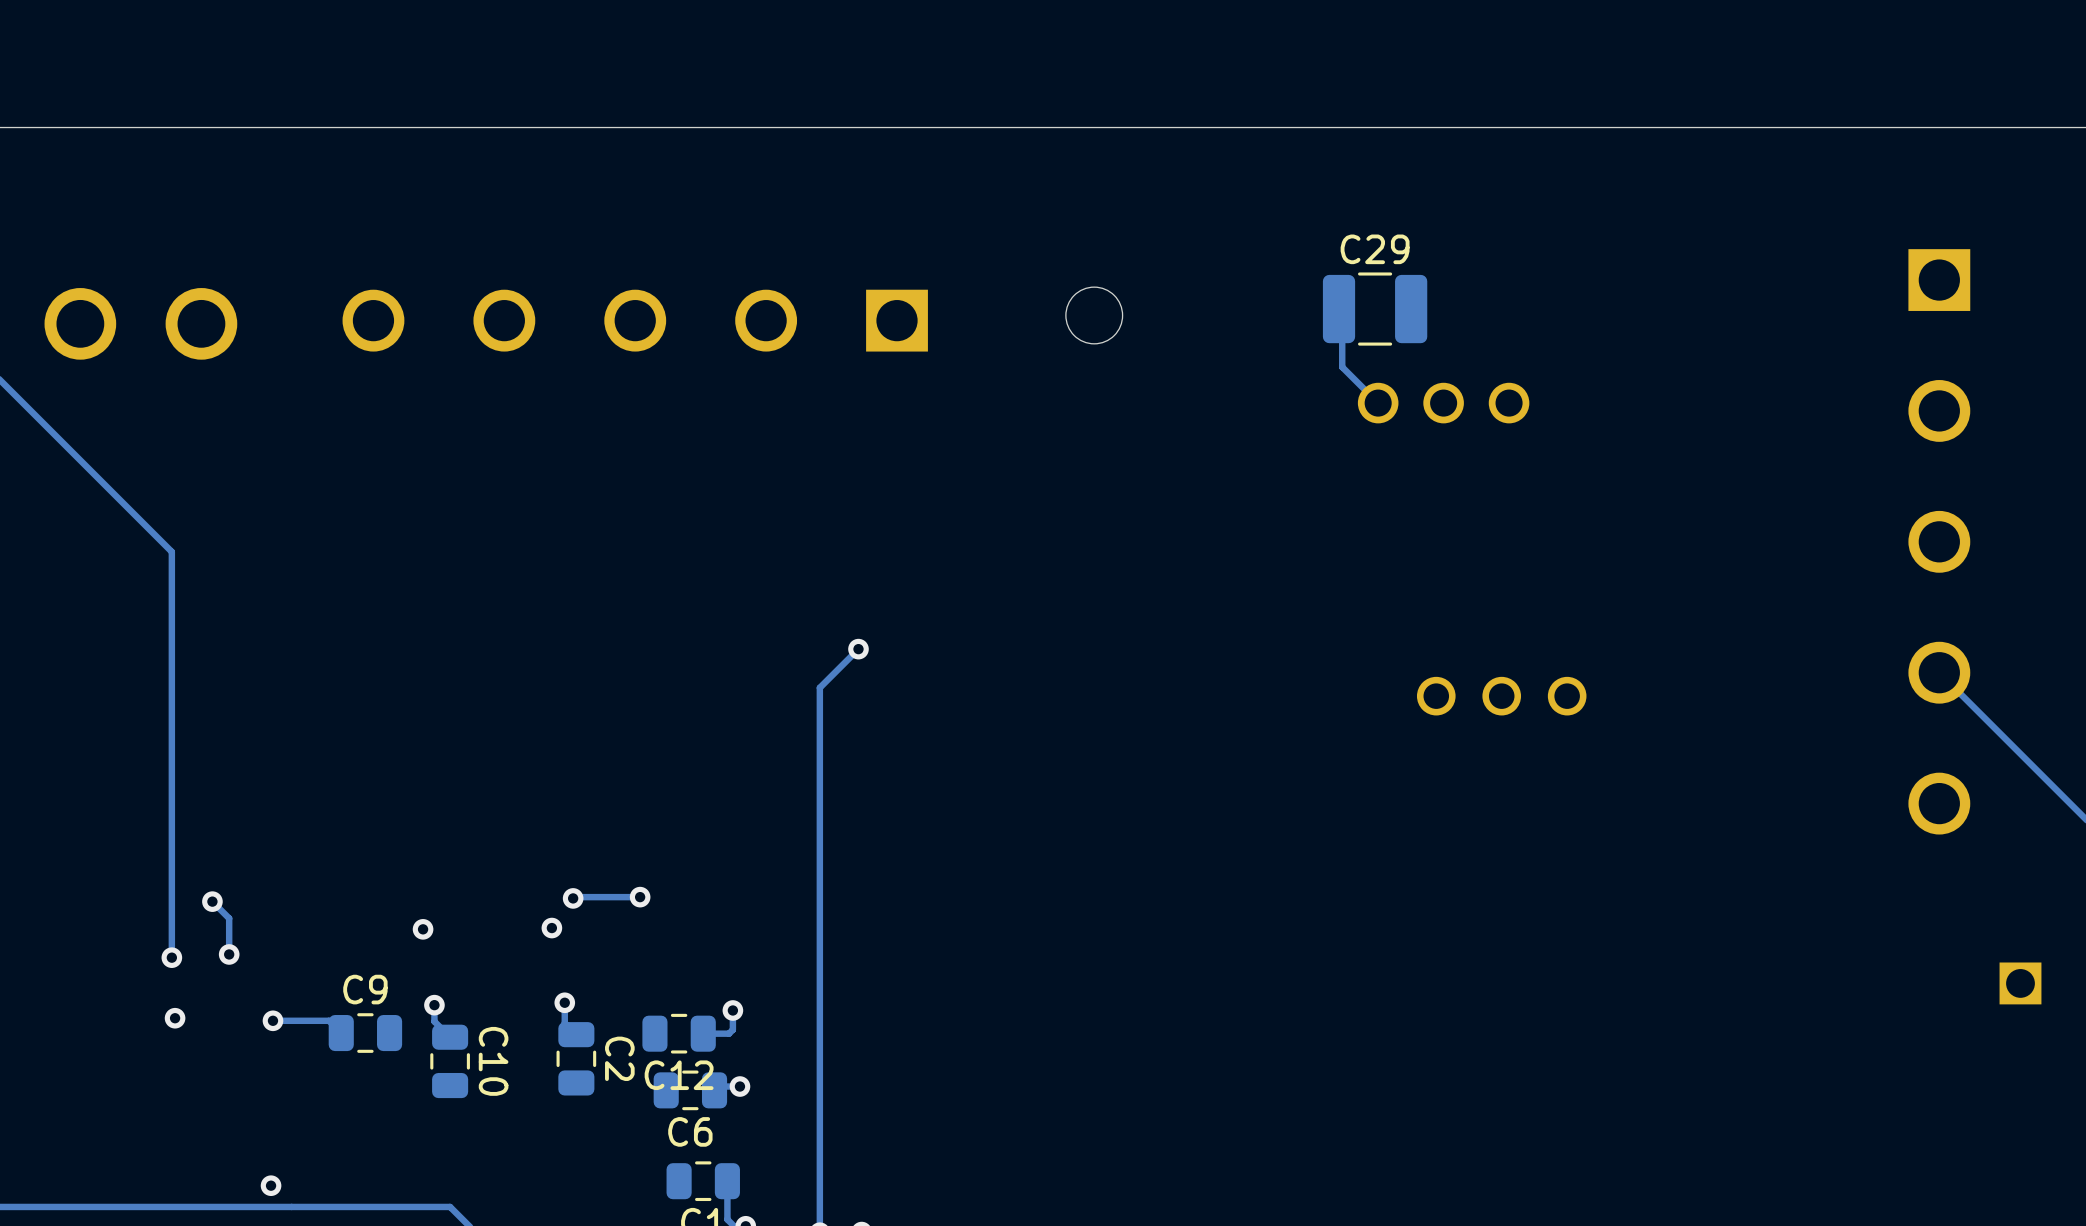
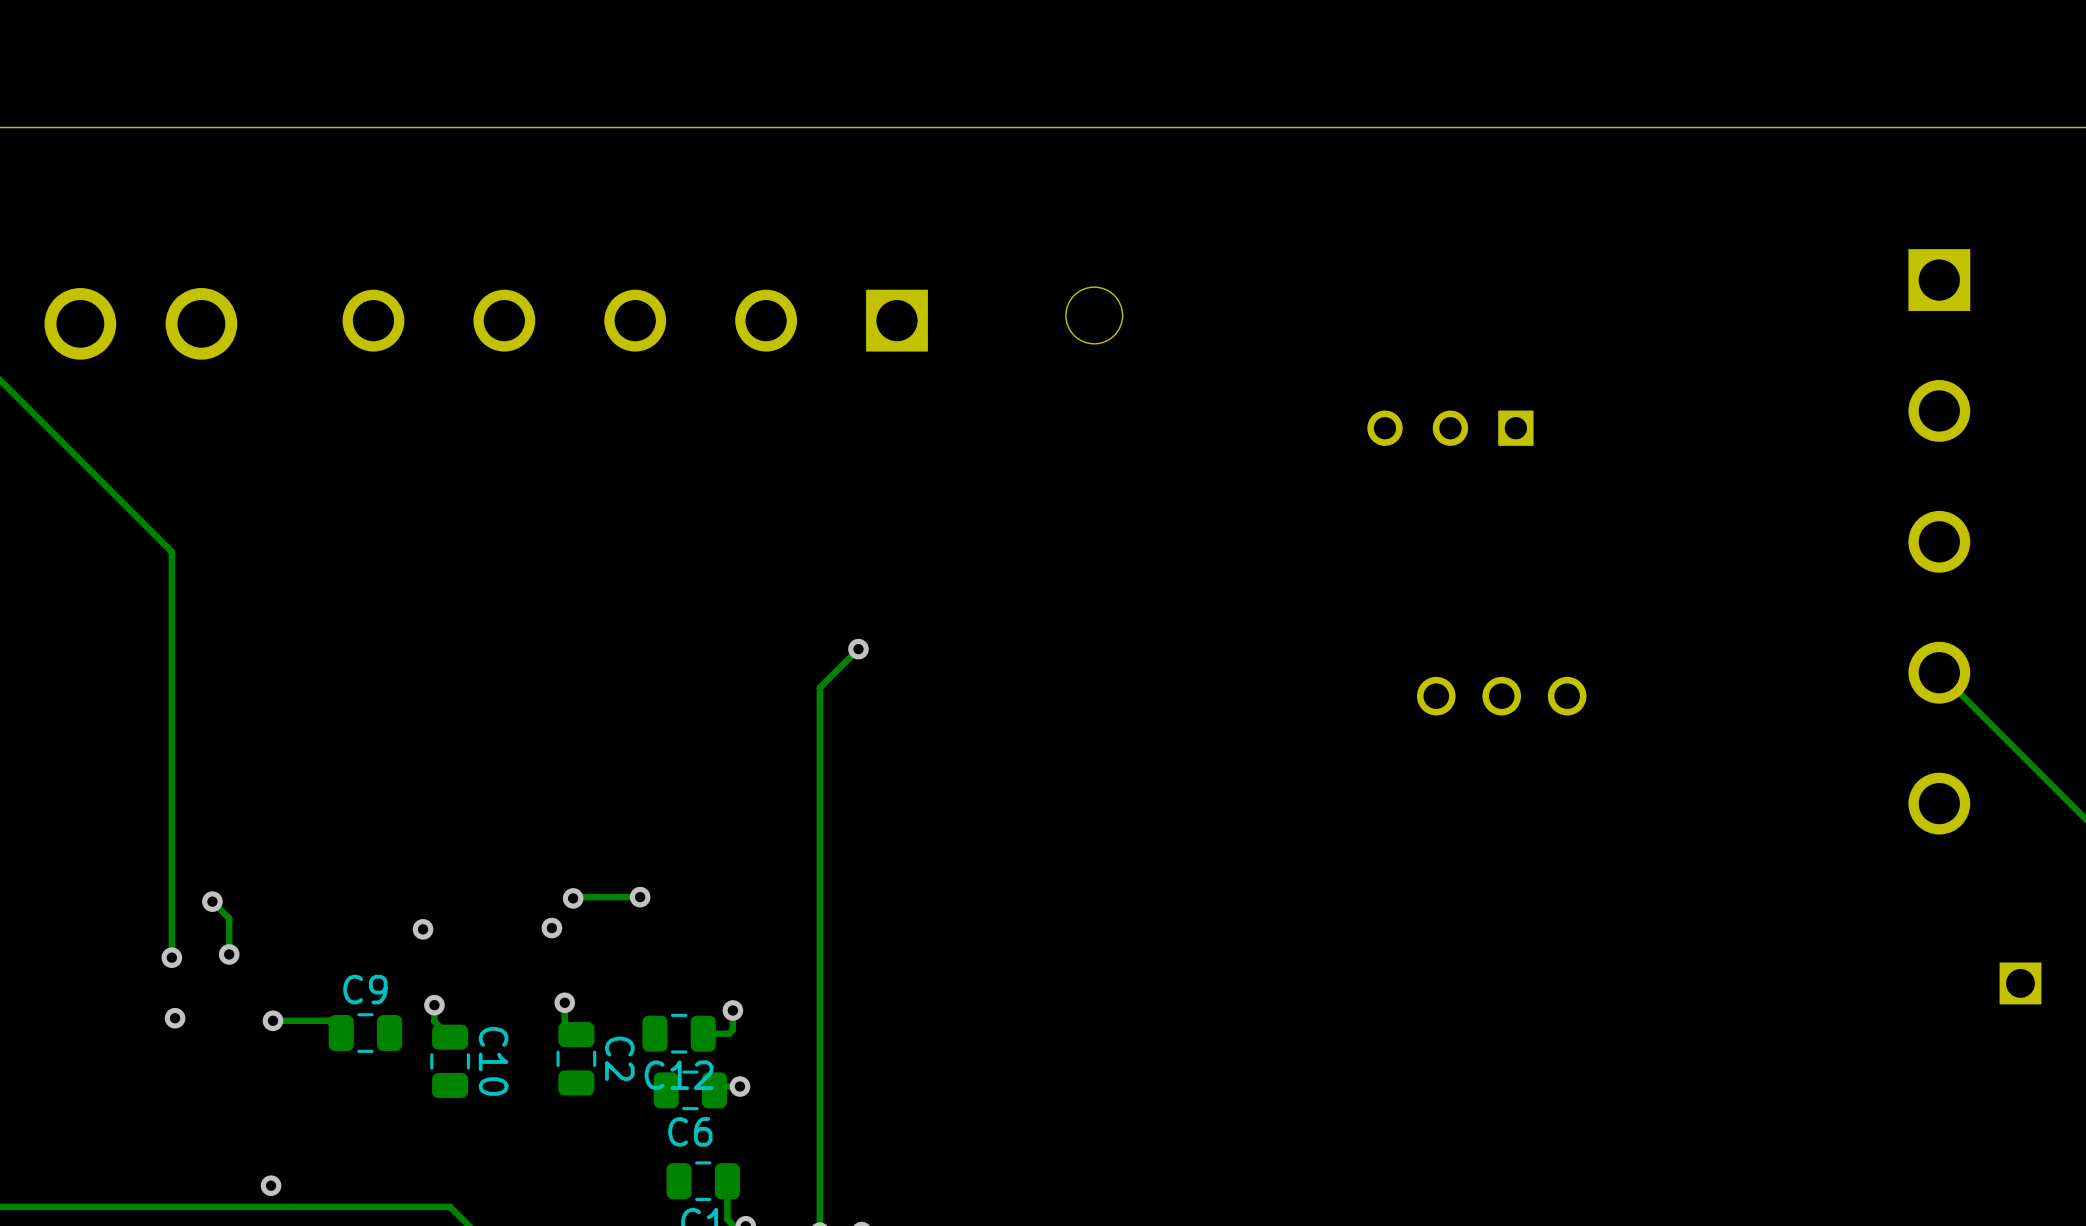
track: (1339, 309) (1342, 312) (1342, 367) (1378, 403) -> none
C29: (1375, 309) -> none
part: (1443, 403) -> none
part: none -> (1450, 428)

